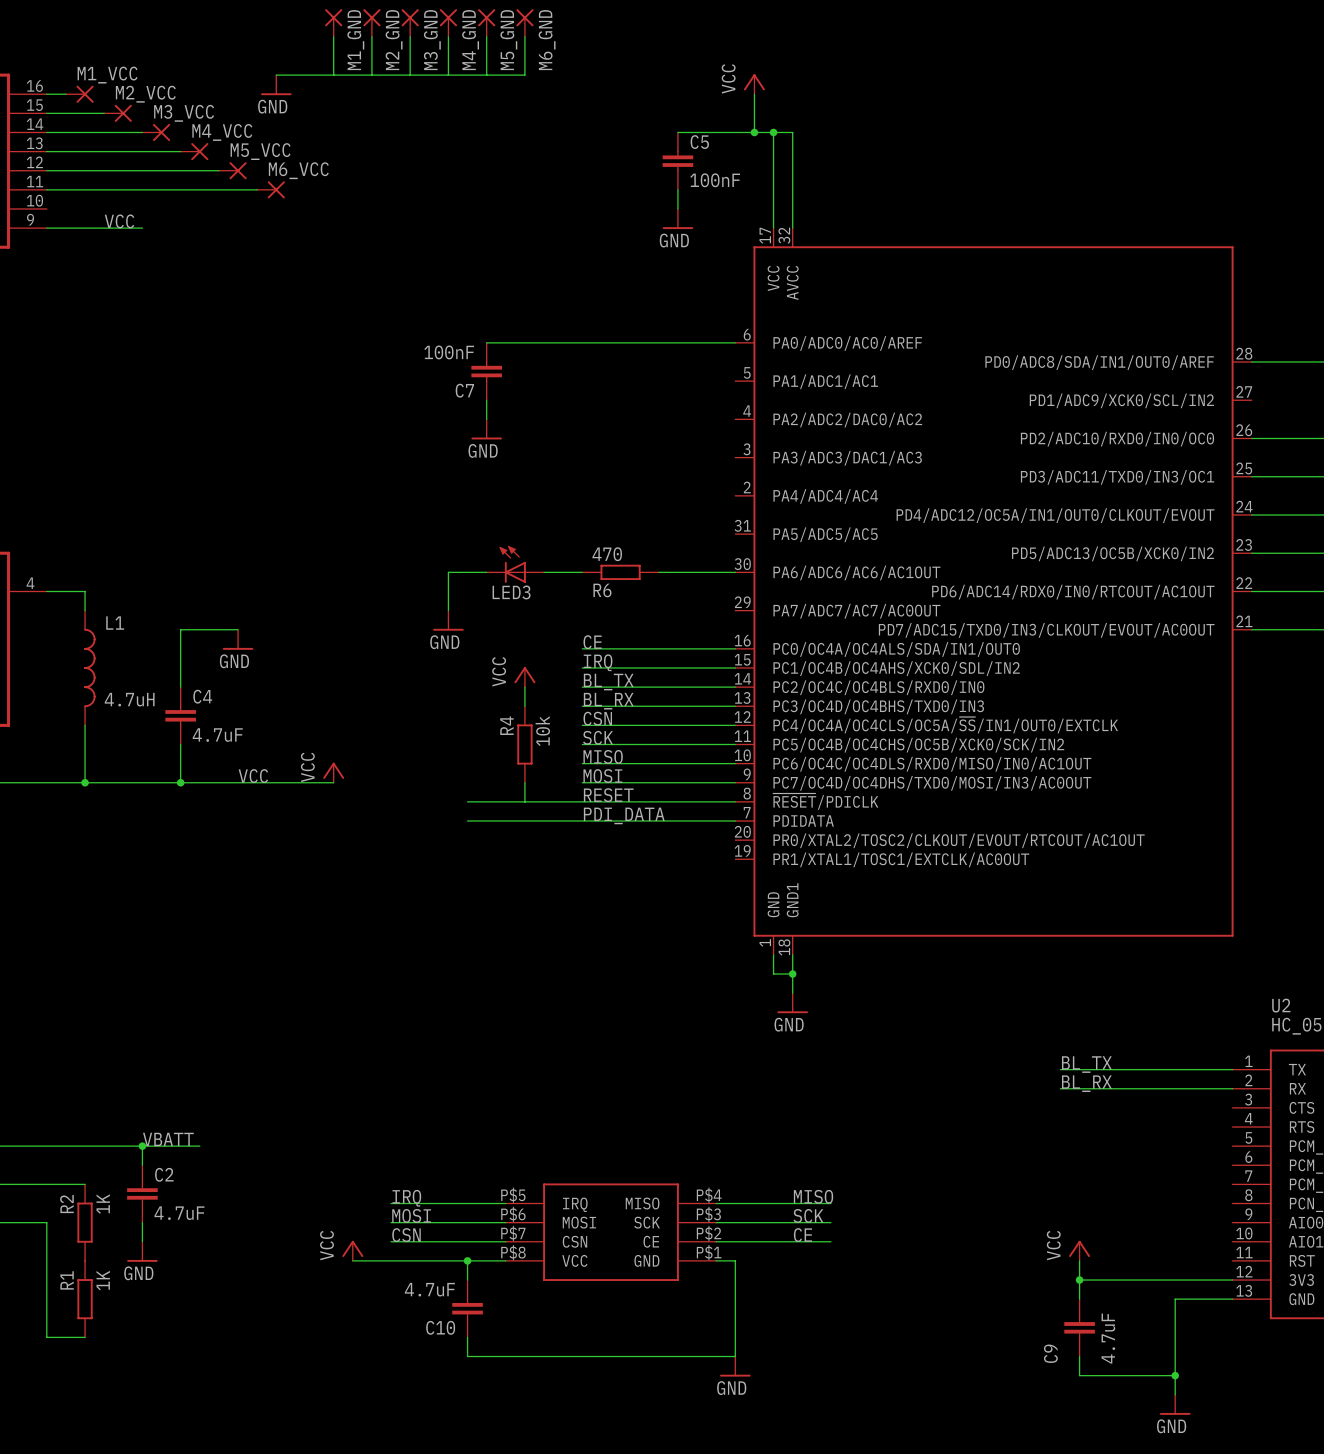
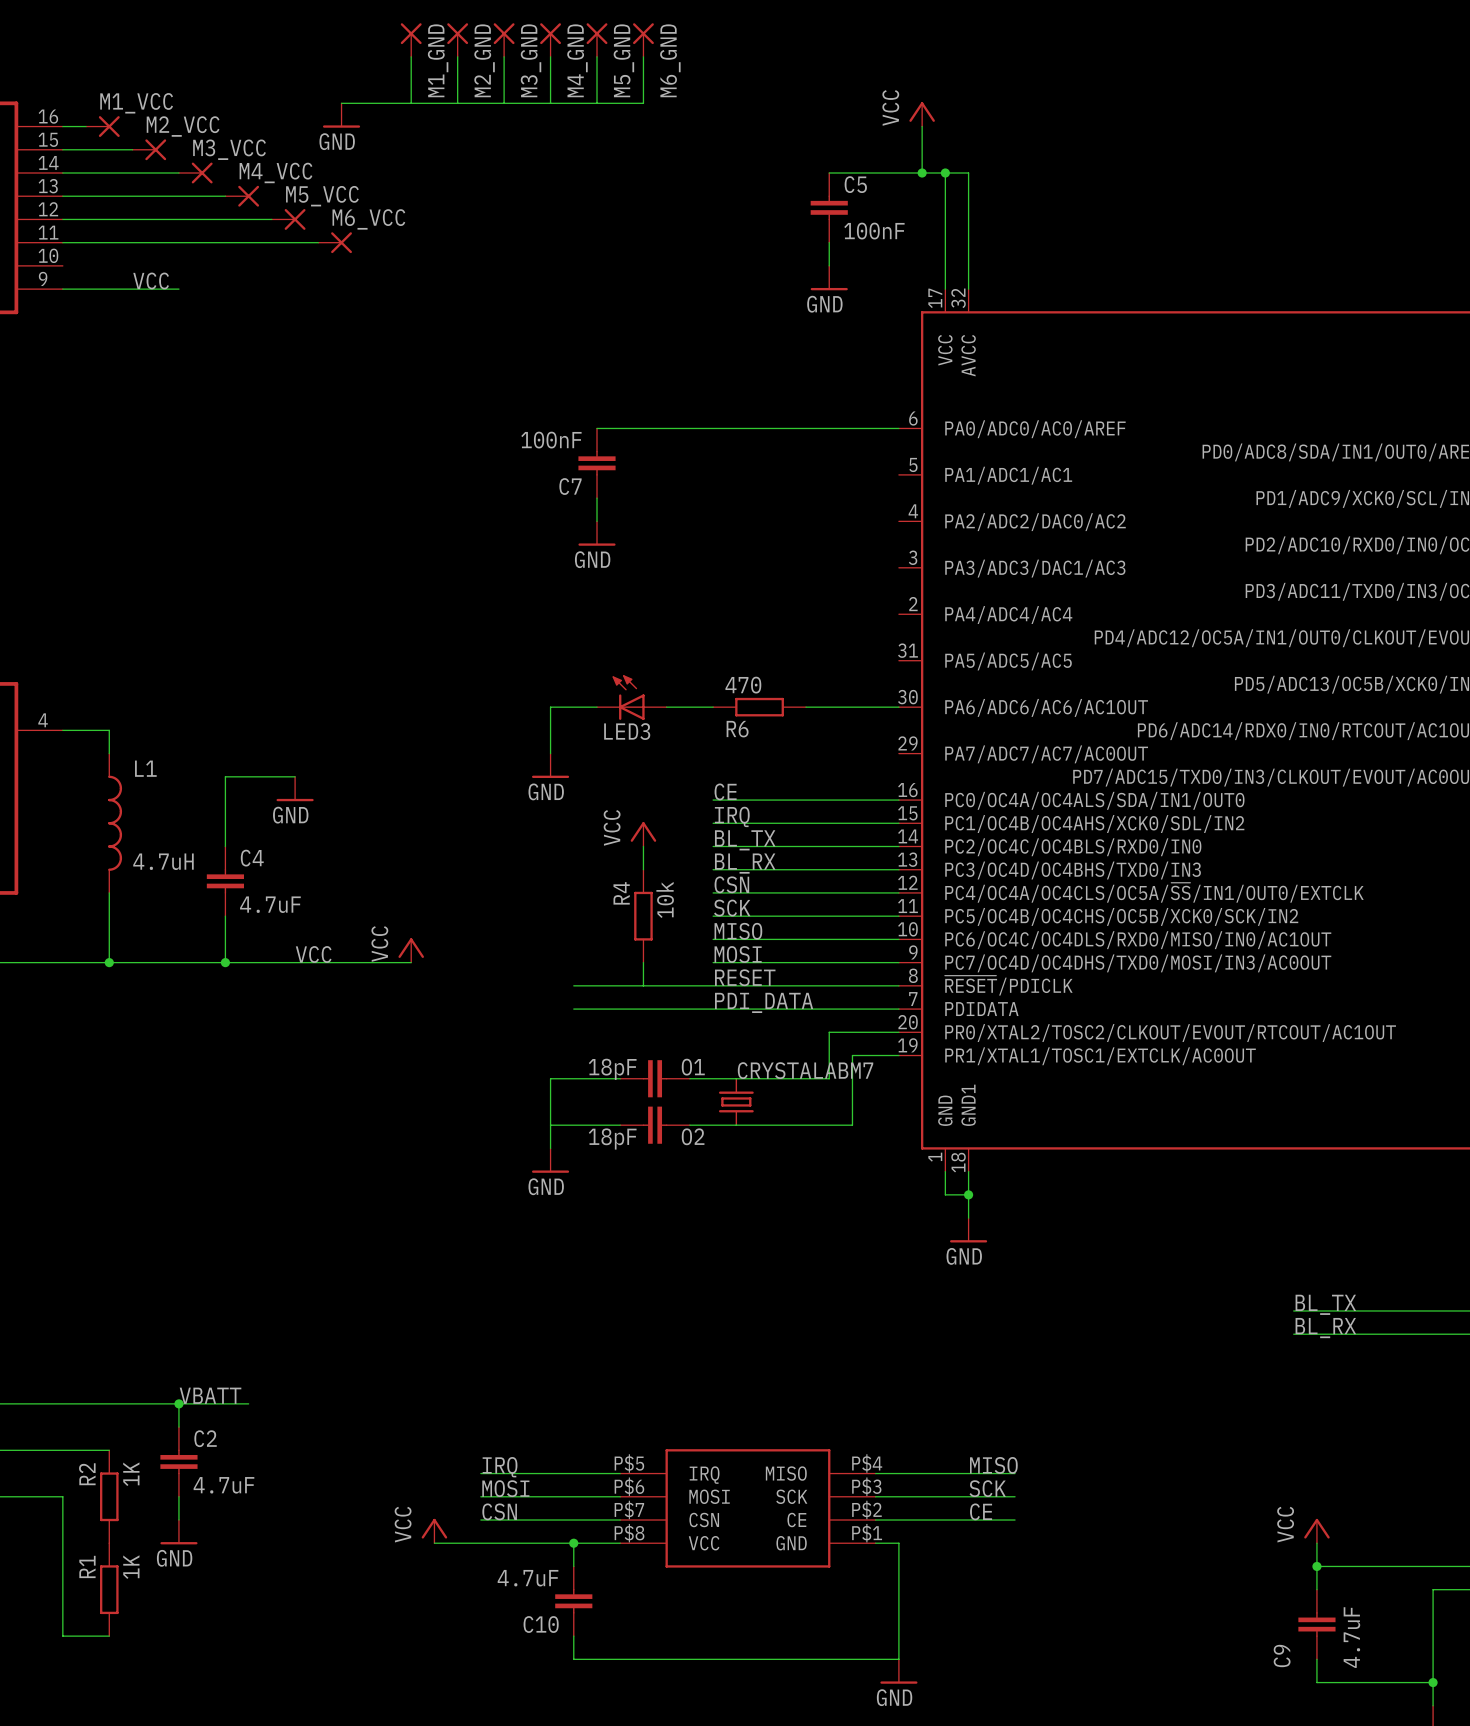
wire: none -> (898, 1032) (829, 1032) (829, 1078) (689, 1078)
wire: none -> (898, 1055) (852, 1055) (852, 1125) (689, 1125)
wire: none -> (620, 1078) (550, 1078) (550, 1148)
O1: none -> 18pF (655, 1078)
part: none -> CRYSTALABM7 (736, 1101)
wire: none -> (550, 1125) (620, 1125)
O2: none -> 18pF (655, 1125)
power symbol: none -> GND (550, 1160)

